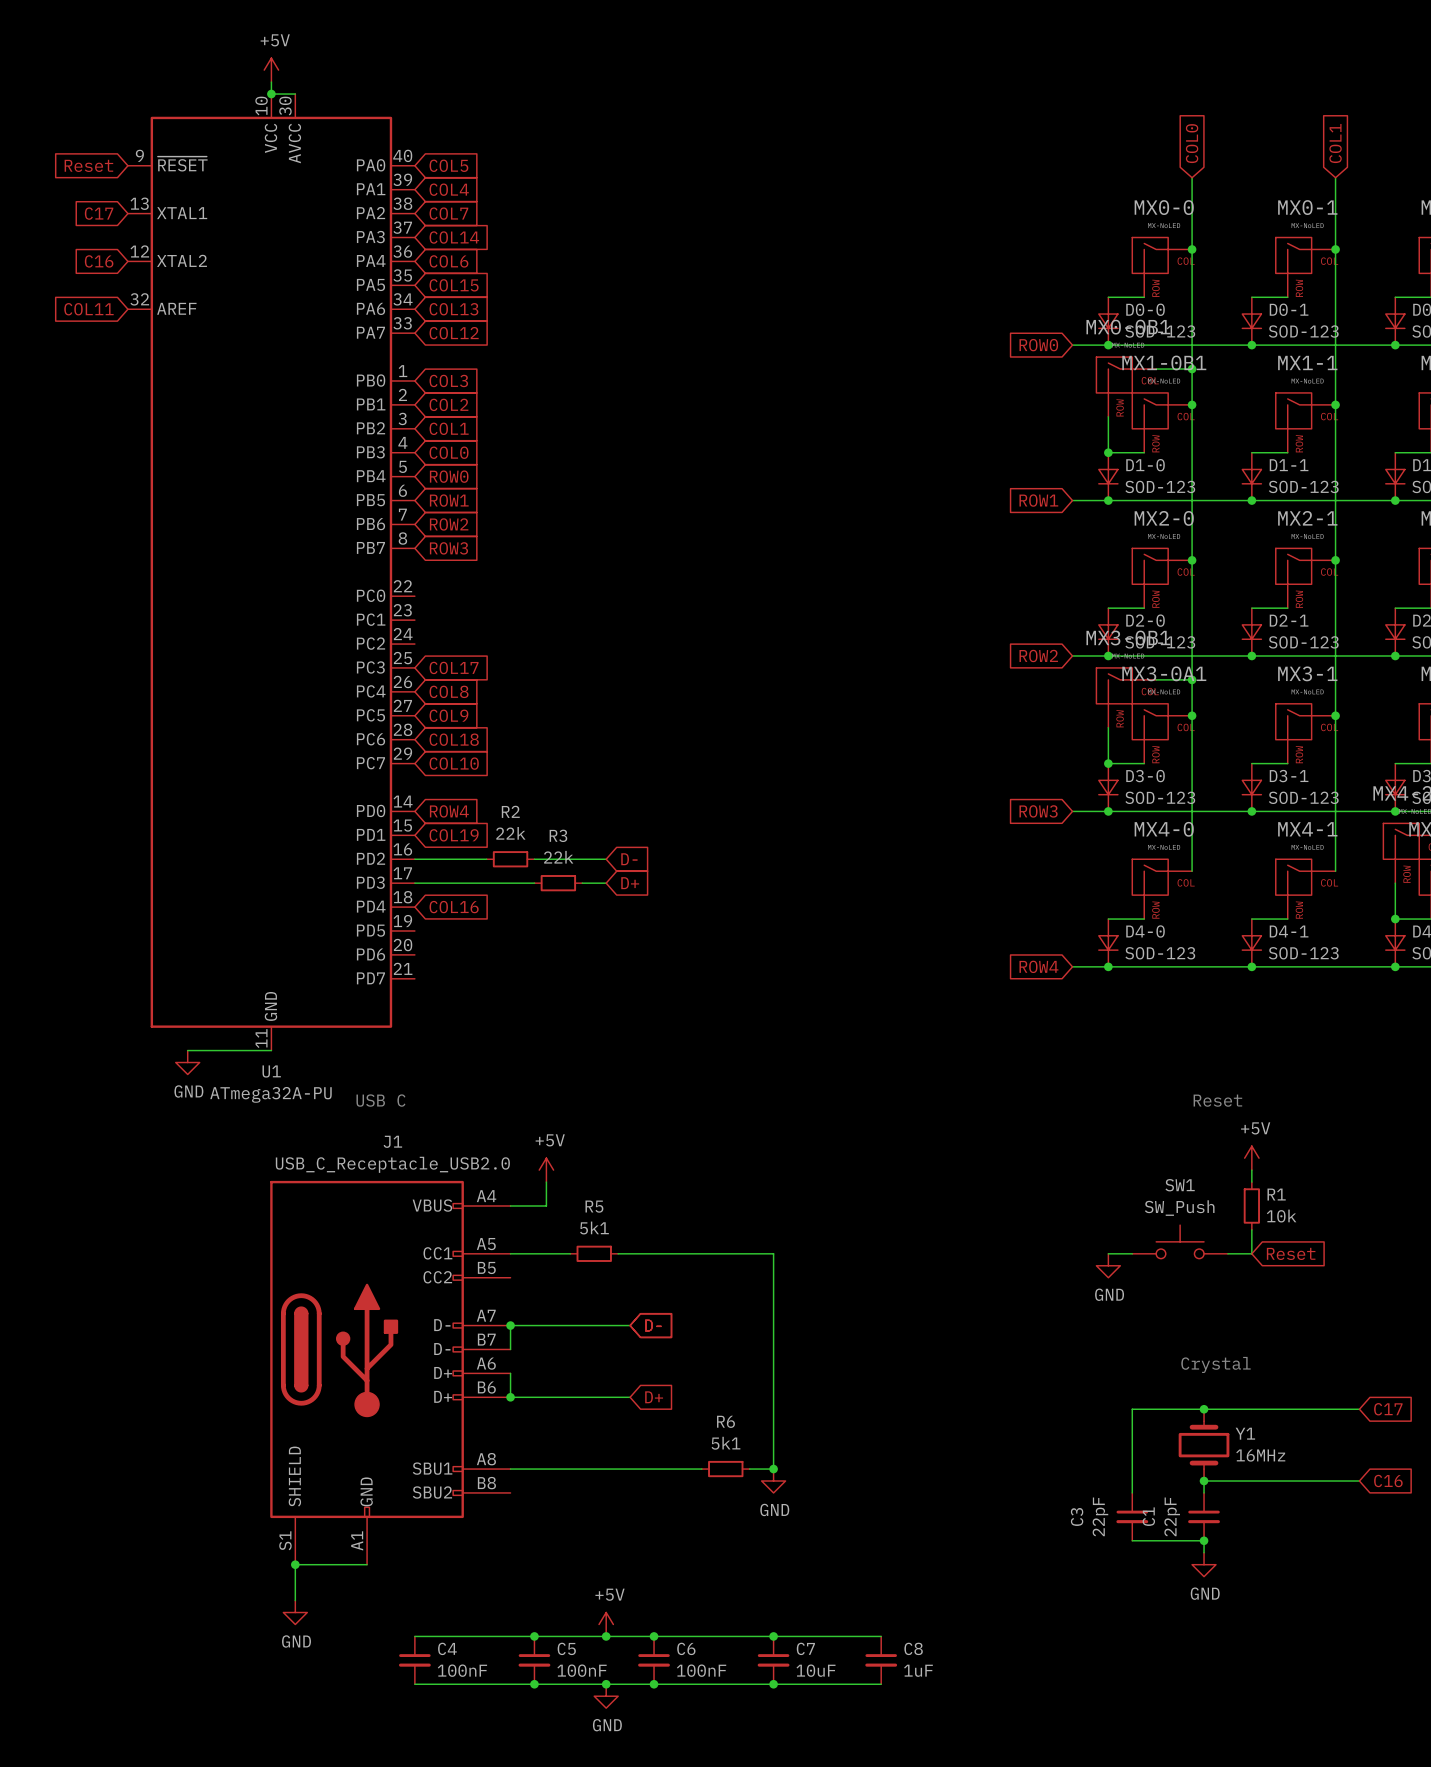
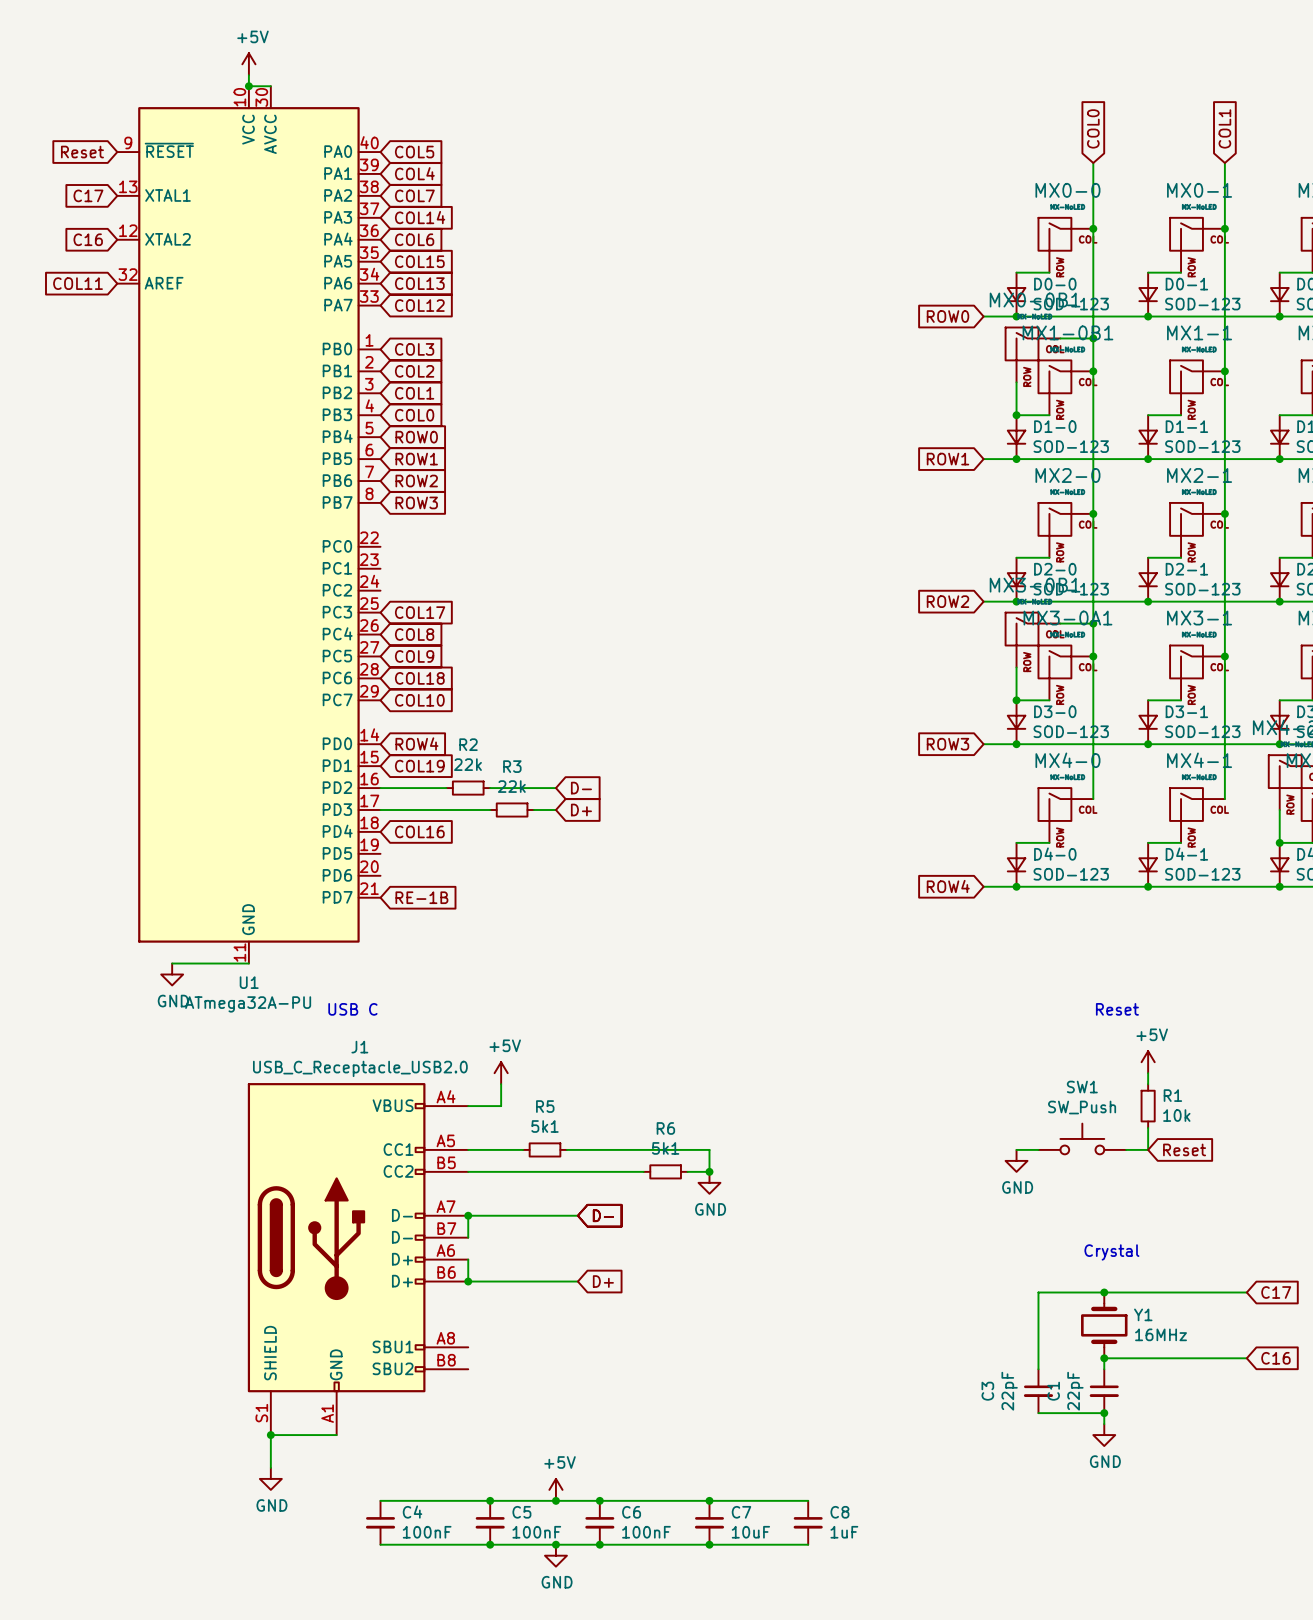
global label: none -> RE-1B (421, 897)
wire: (773, 1277) (773, 1469) (749, 1469) -> (709, 1171) (687, 1171)
junction: none -> (709, 1171)
wire: (510, 1469) (701, 1469) -> (468, 1171) (643, 1171)
R6 position: (725, 1469) -> (665, 1171)
junction: (773, 1469) -> none
power symbol position: GND (773, 1481) -> GND (709, 1182)

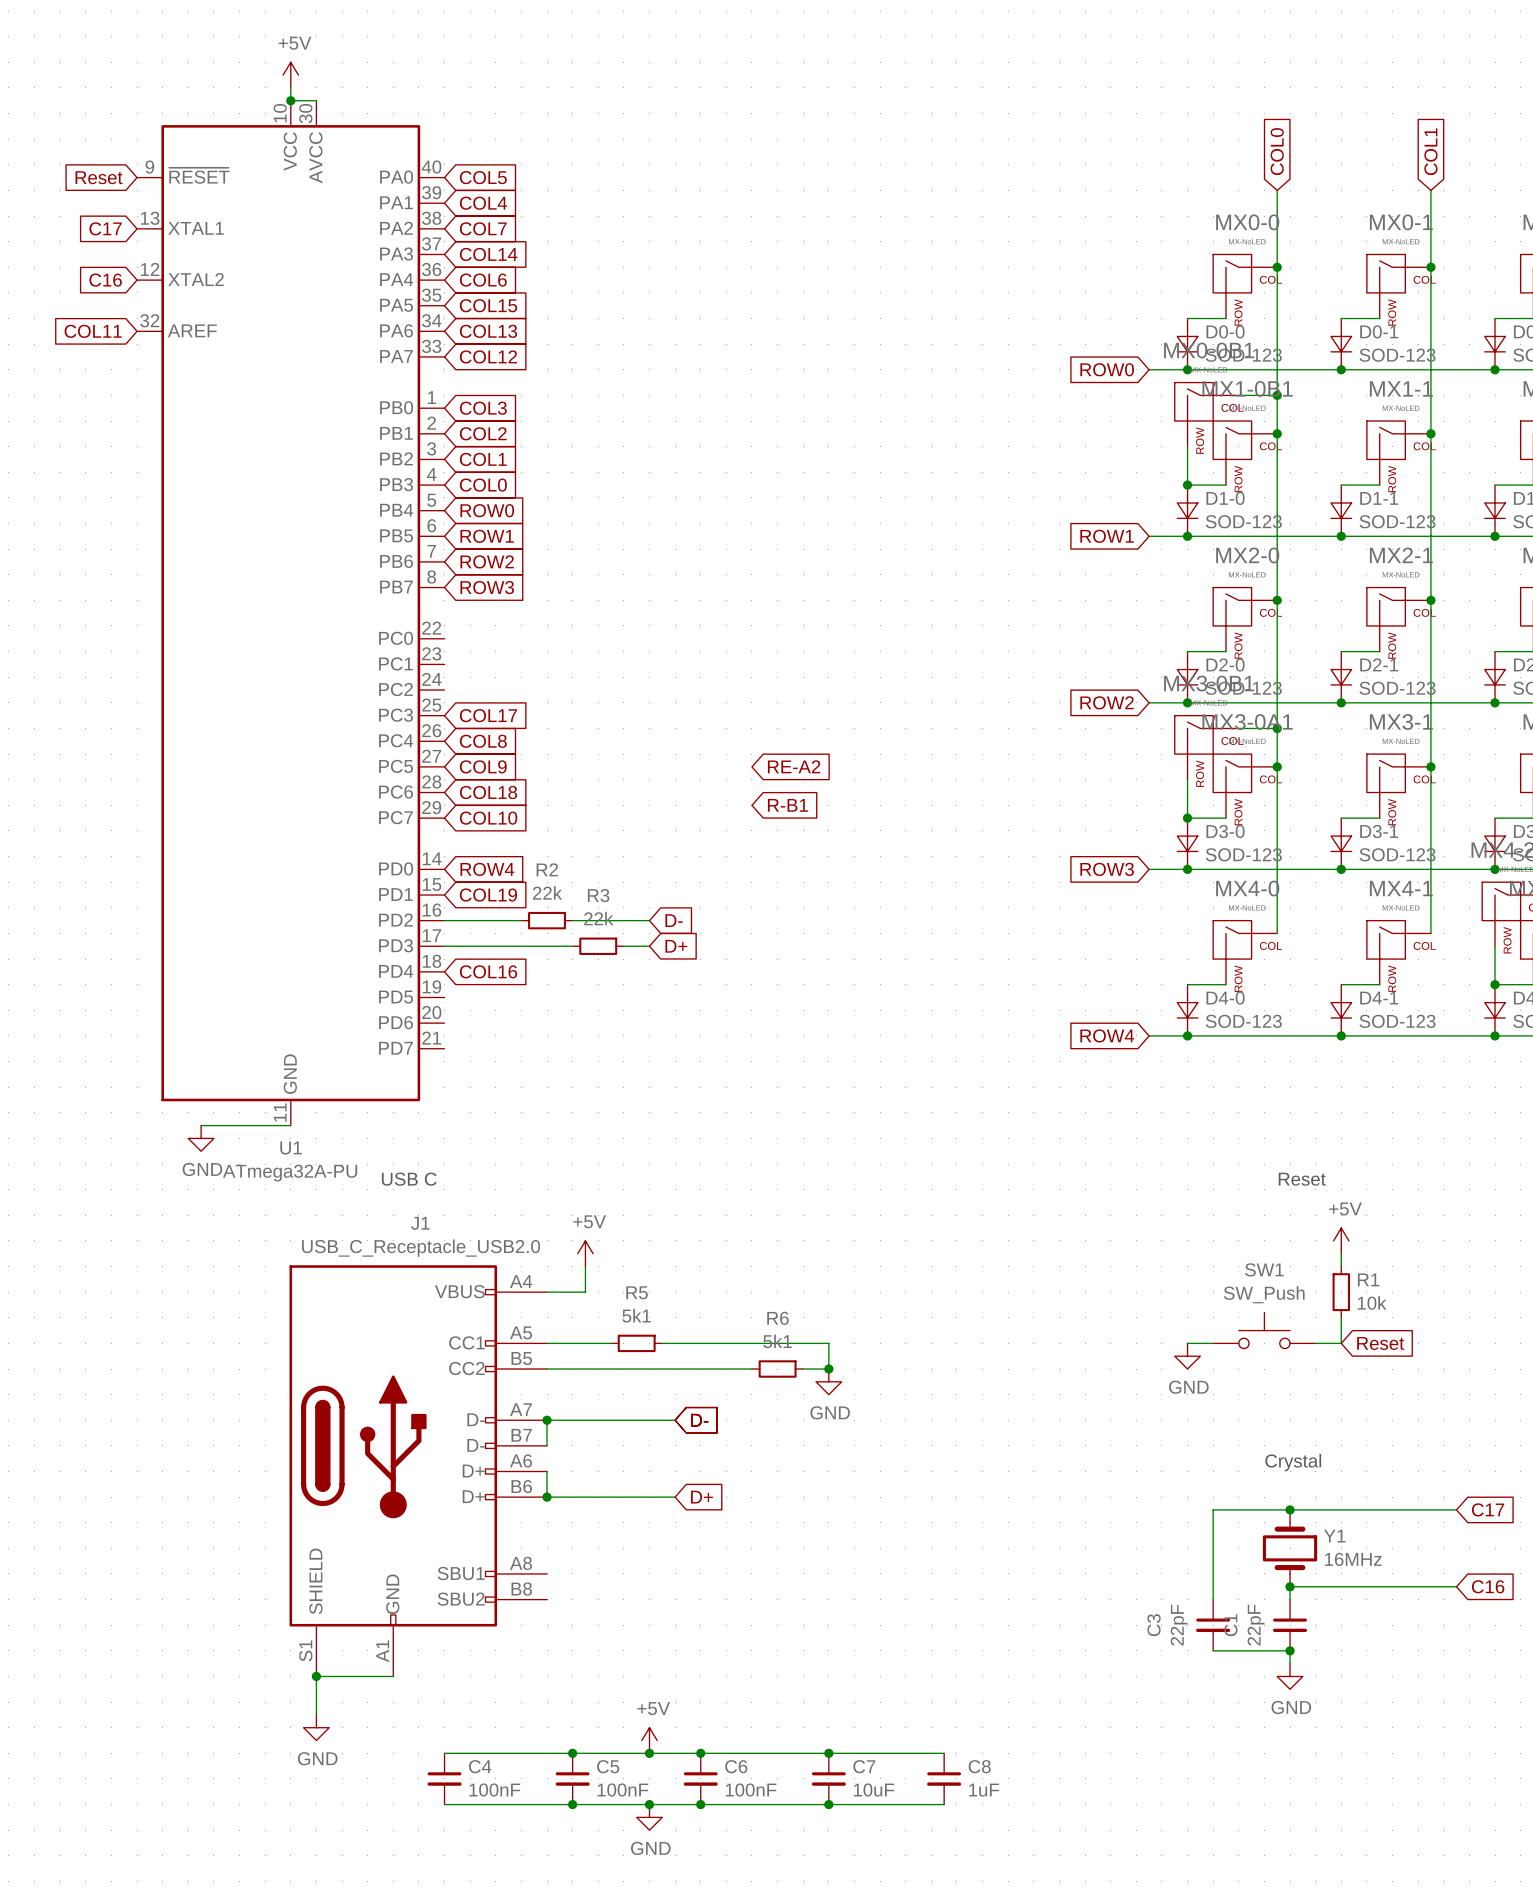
global label: none -> RE-A2 (794, 766)
global label: none -> R-B1 (787, 805)
global label: RE-1B (421, 897) -> none

